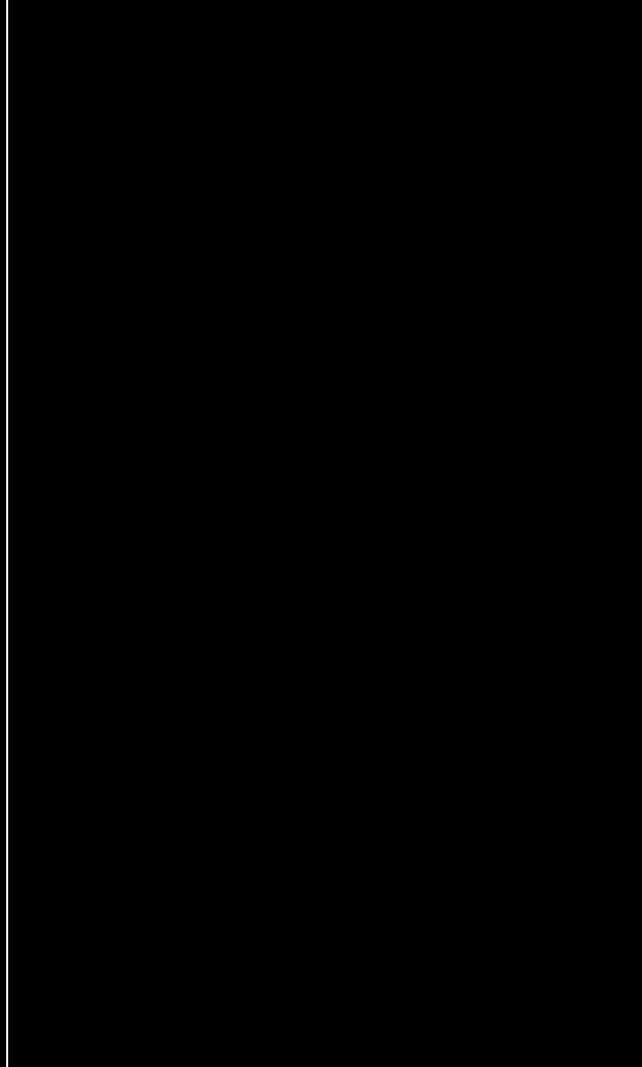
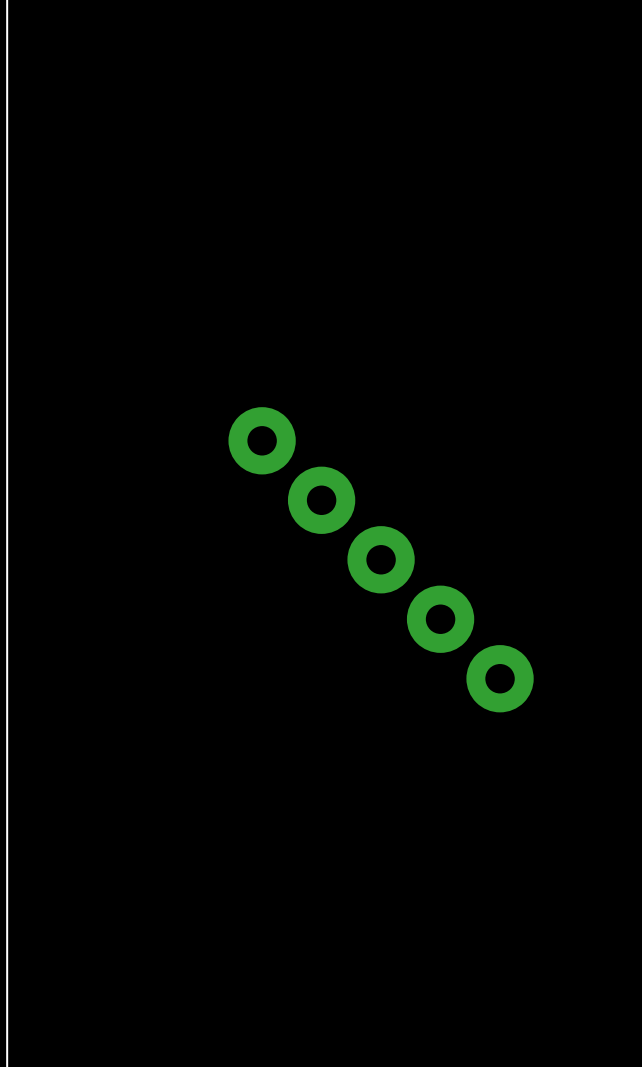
part: none -> (381, 559)

